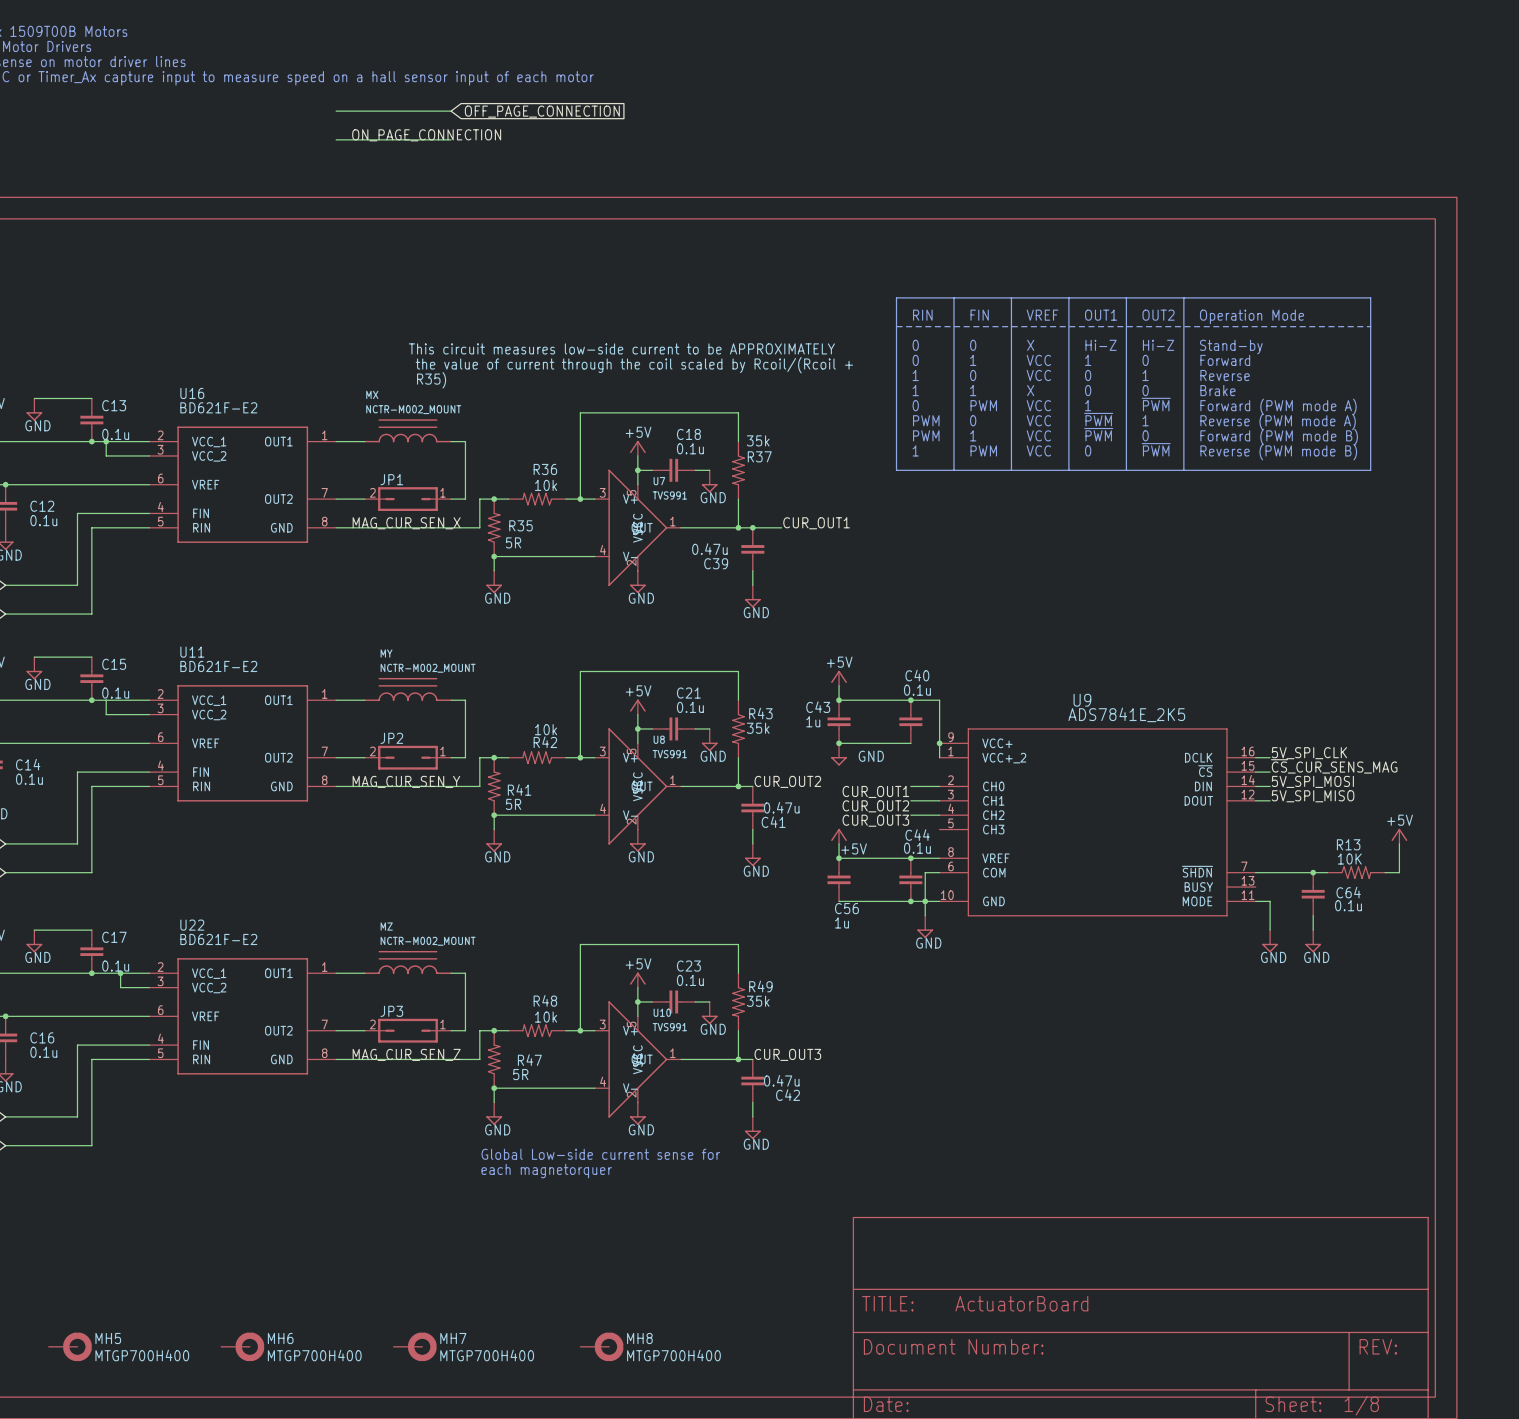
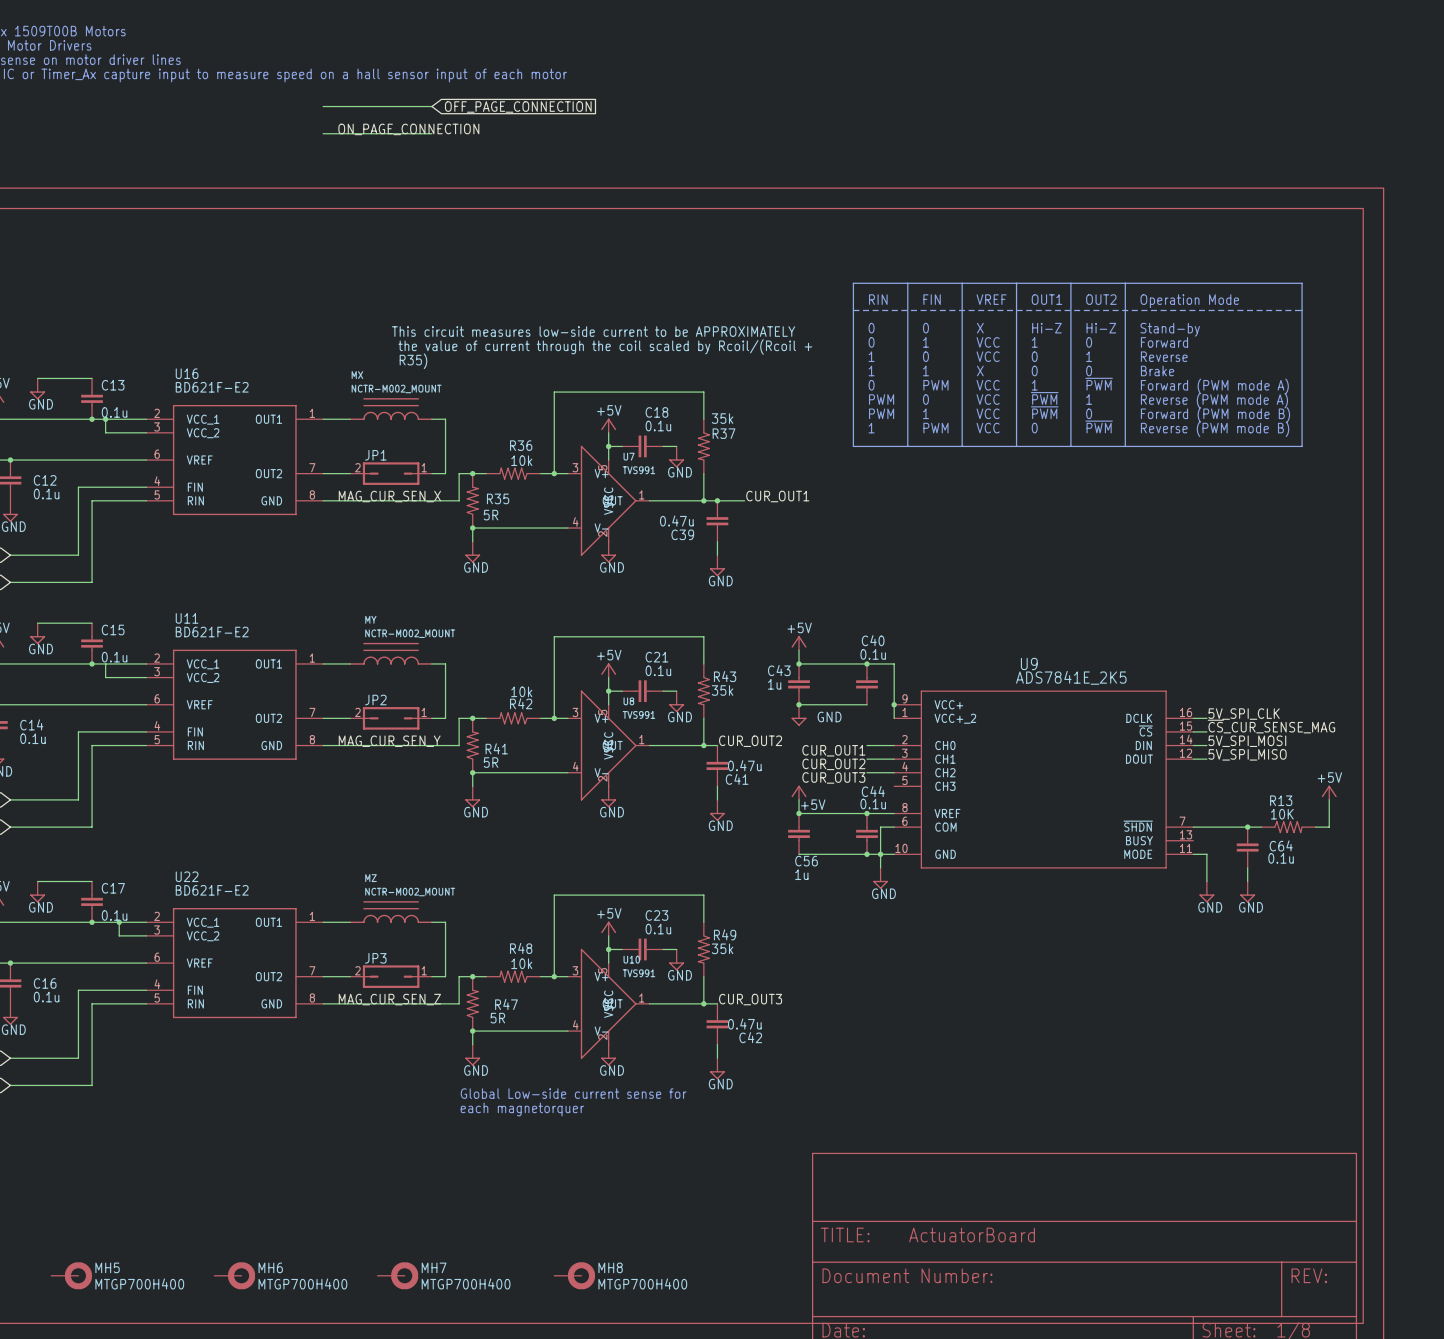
label: ~{CS}_CUR_SENS_MAG (1334, 766) -> ~{CS}_CUR_SENSE_MAG (1271, 726)

